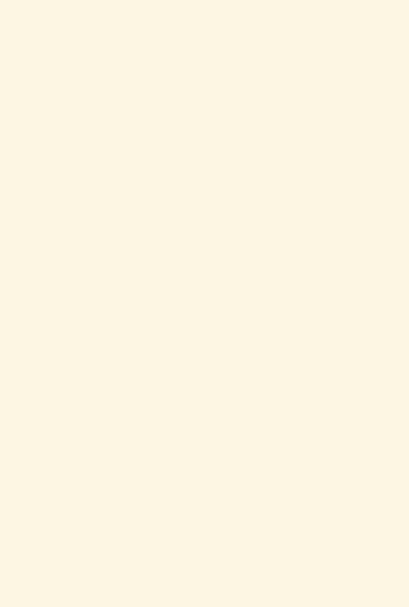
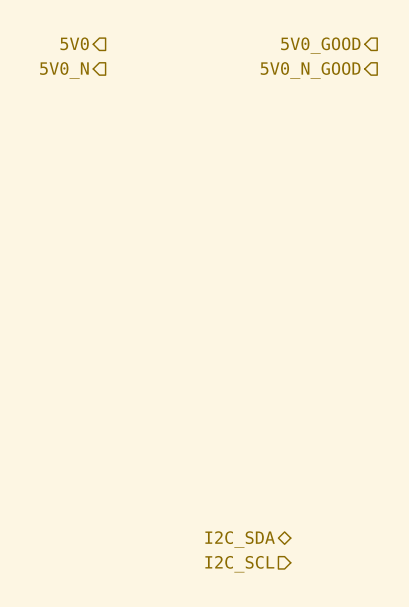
hierarchical label: none -> 5V0 (74, 43)
hierarchical label: none -> 5V0_GOOD (320, 45)
hierarchical label: none -> 5V0_N (64, 70)
hierarchical label: none -> 5V0_N_GOOD (310, 70)
hierarchical label: none -> I2C_SDA (240, 539)
hierarchical label: none -> I2C_SCL (239, 564)

